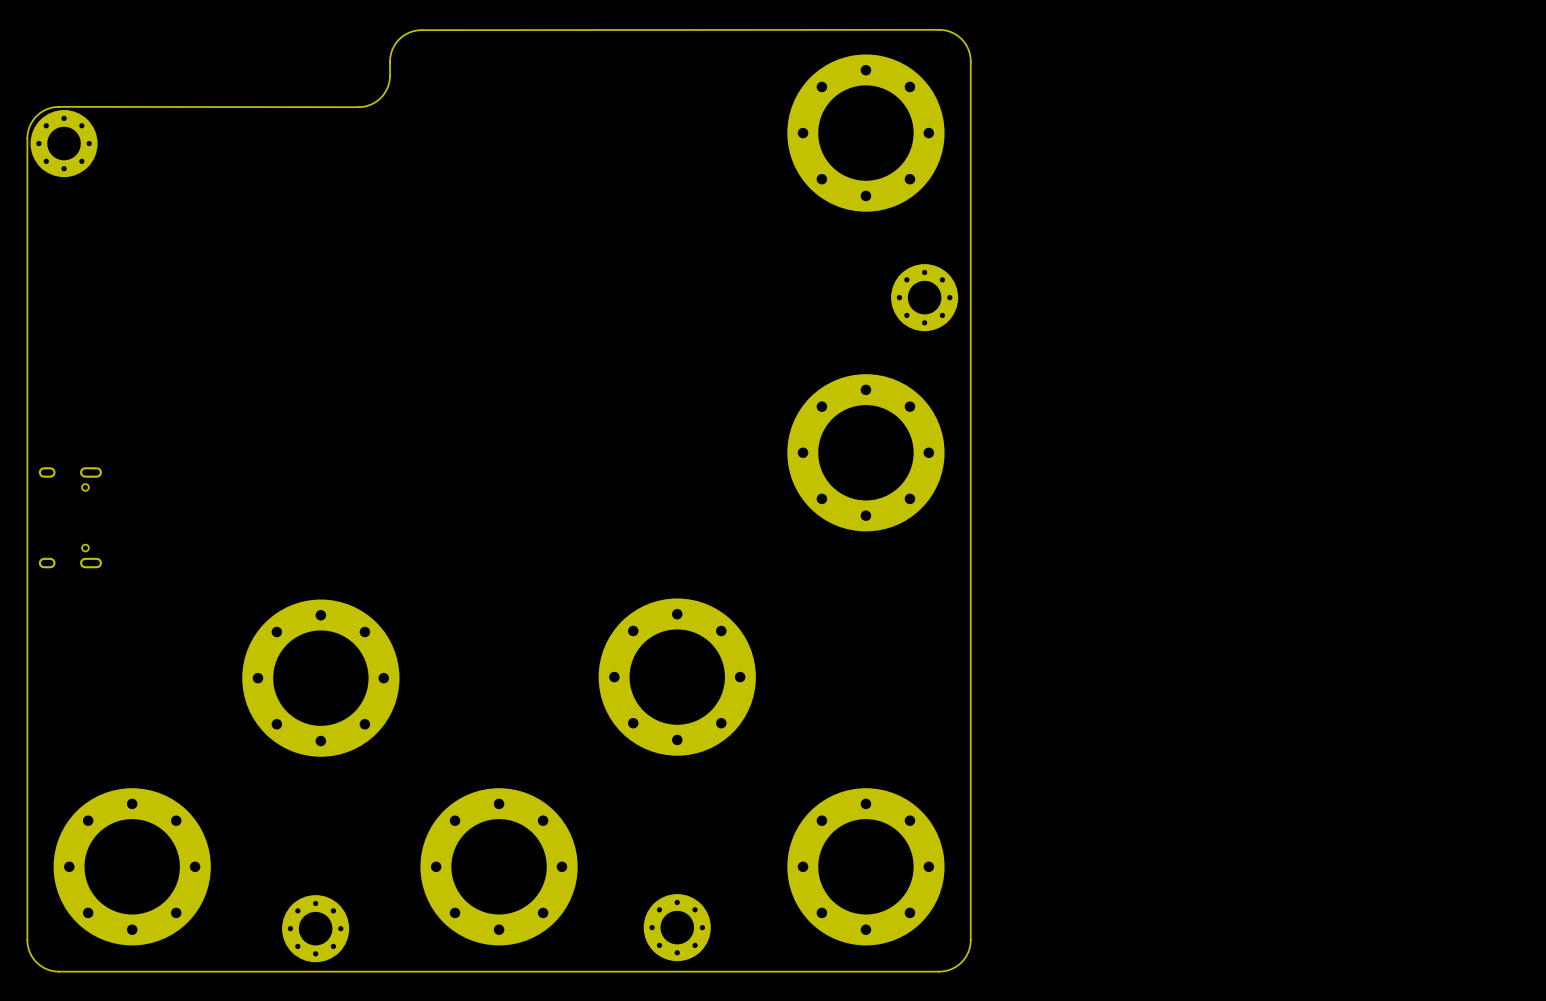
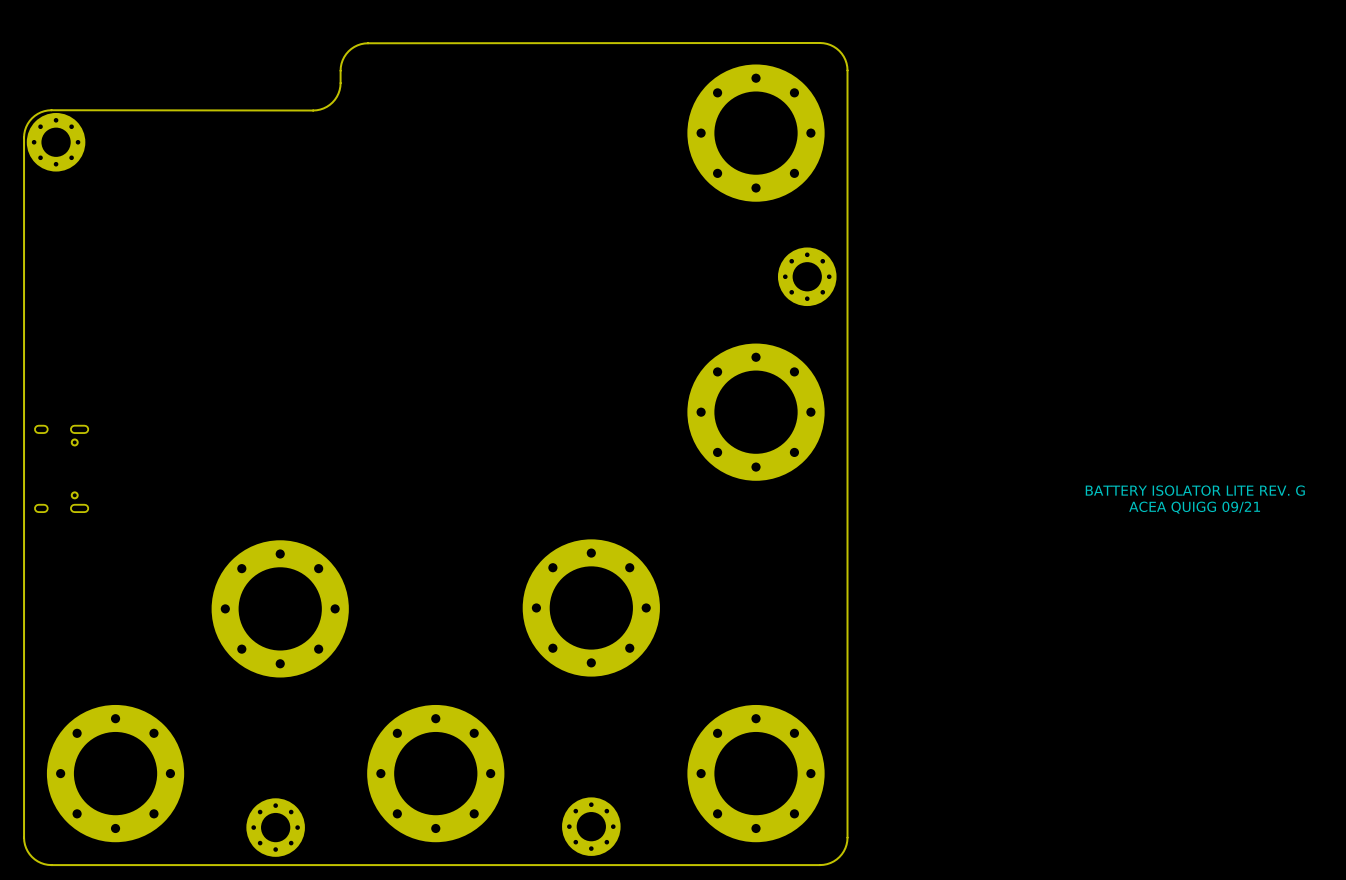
text: none -> BATTERY ISOLATOR LITE REV. G (1195, 490)
text: none -> ACEA QUIGG 09/21 (1194, 507)

